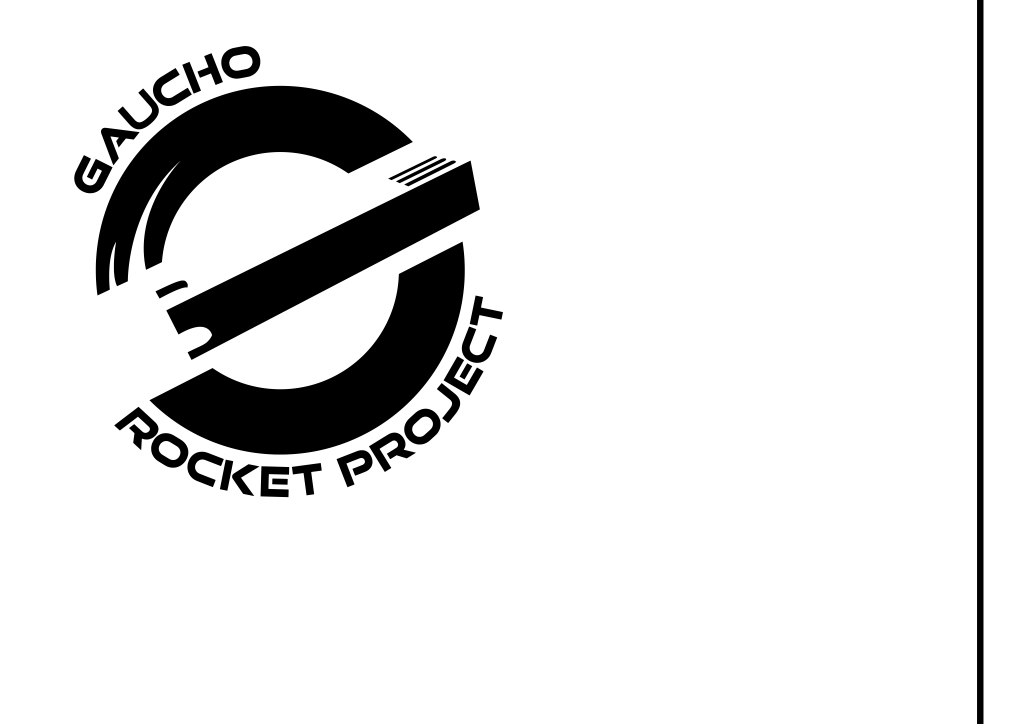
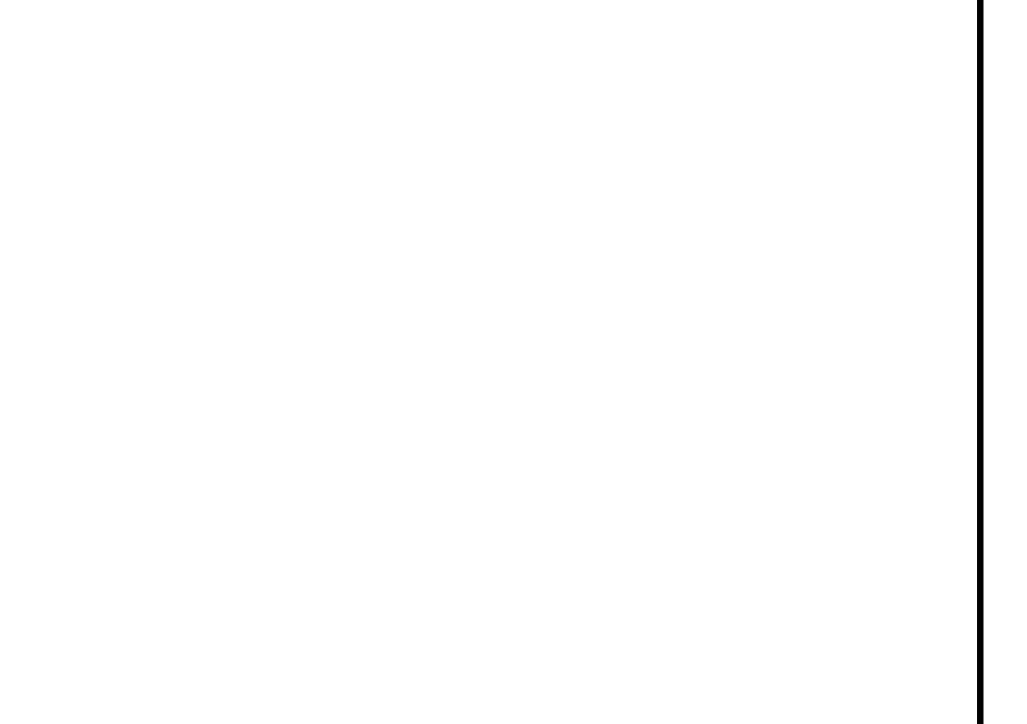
drawing: [74, 46, 503, 498] -> none

